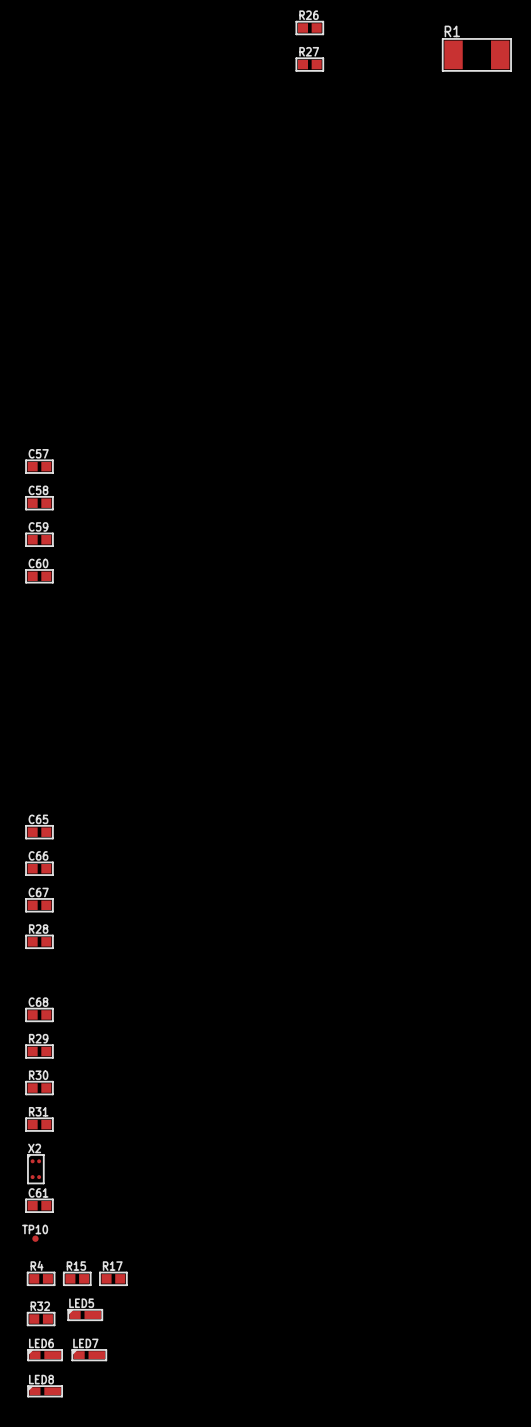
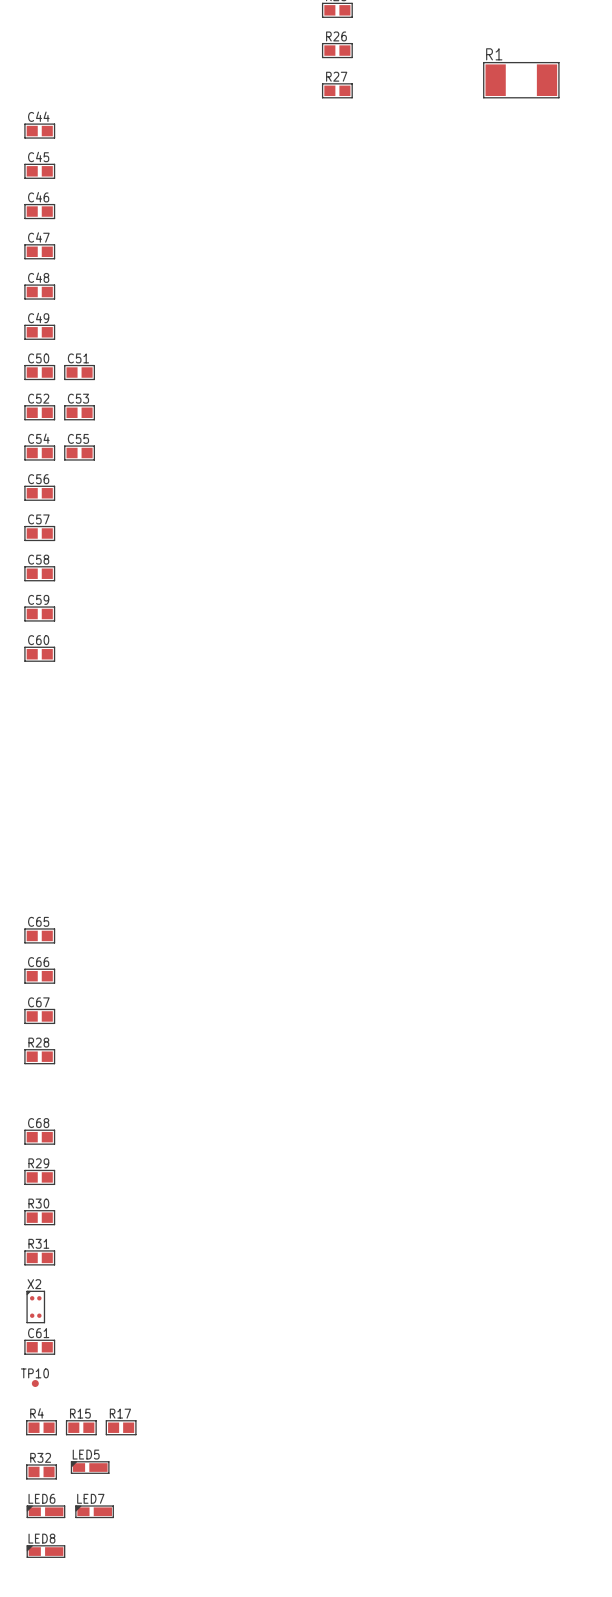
C44: none -> (39, 131)
C45: none -> (39, 171)
C46: none -> (39, 211)
C47: none -> (39, 251)
C48: none -> (39, 292)
C49: none -> (39, 332)
C50: none -> (39, 372)
C51: none -> (79, 372)
C52: none -> (39, 412)
C53: none -> (79, 412)
C54: none -> (39, 453)
C55: none -> (79, 453)
C56: none -> (39, 493)

